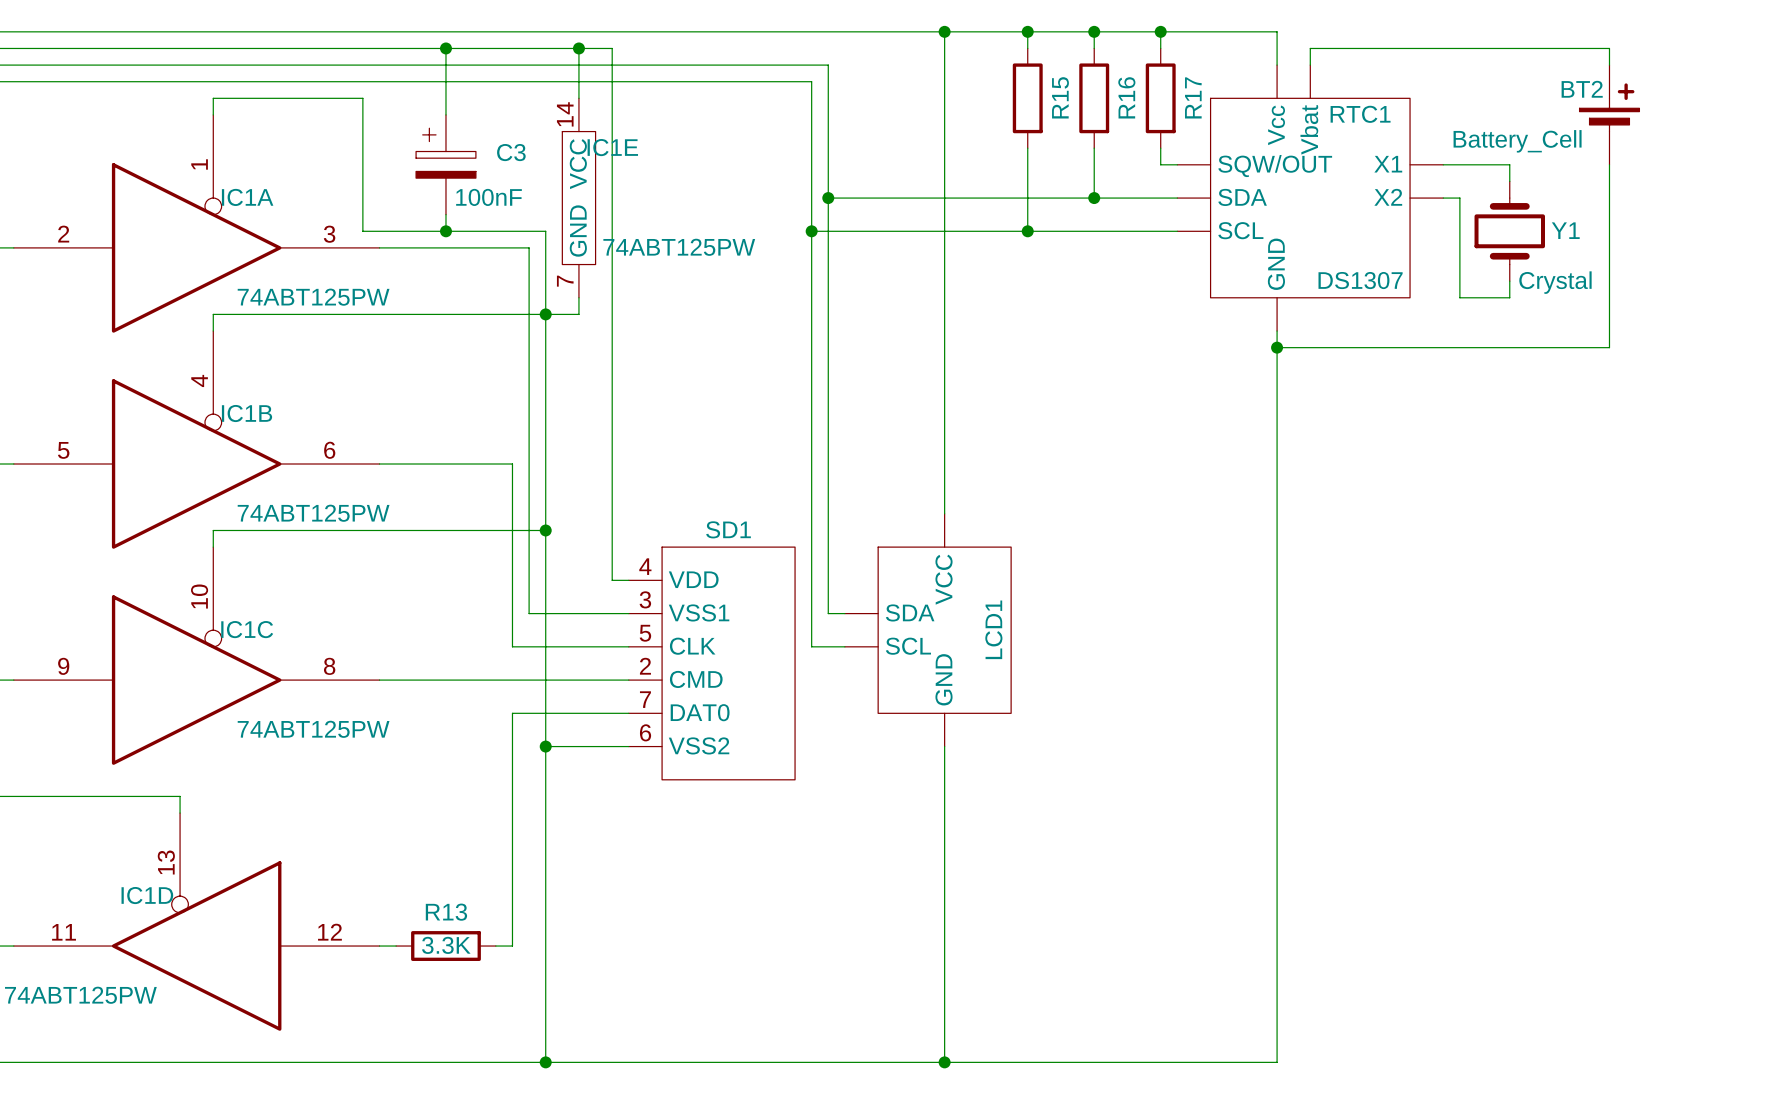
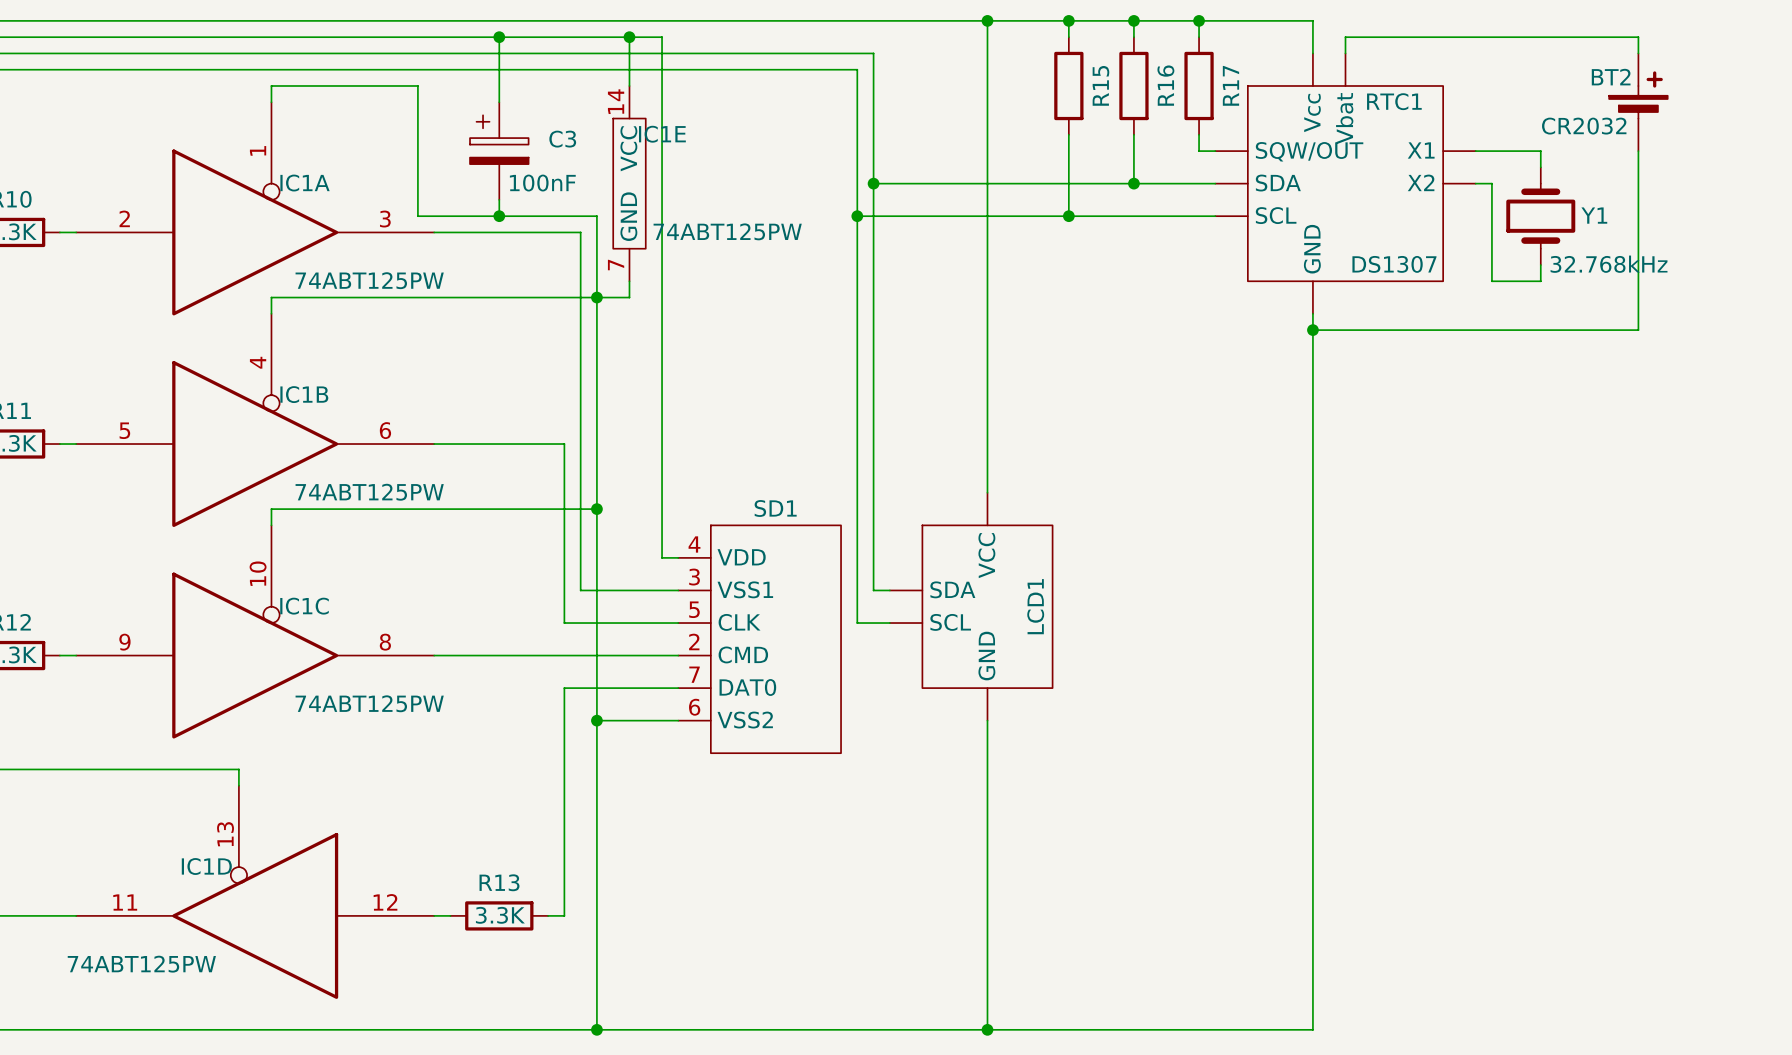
BT2 value: Battery_Cell (1517, 141) -> CR2032 (1584, 126)
Y1 value: Crystal (1555, 282) -> 32.768kHz (1609, 264)

